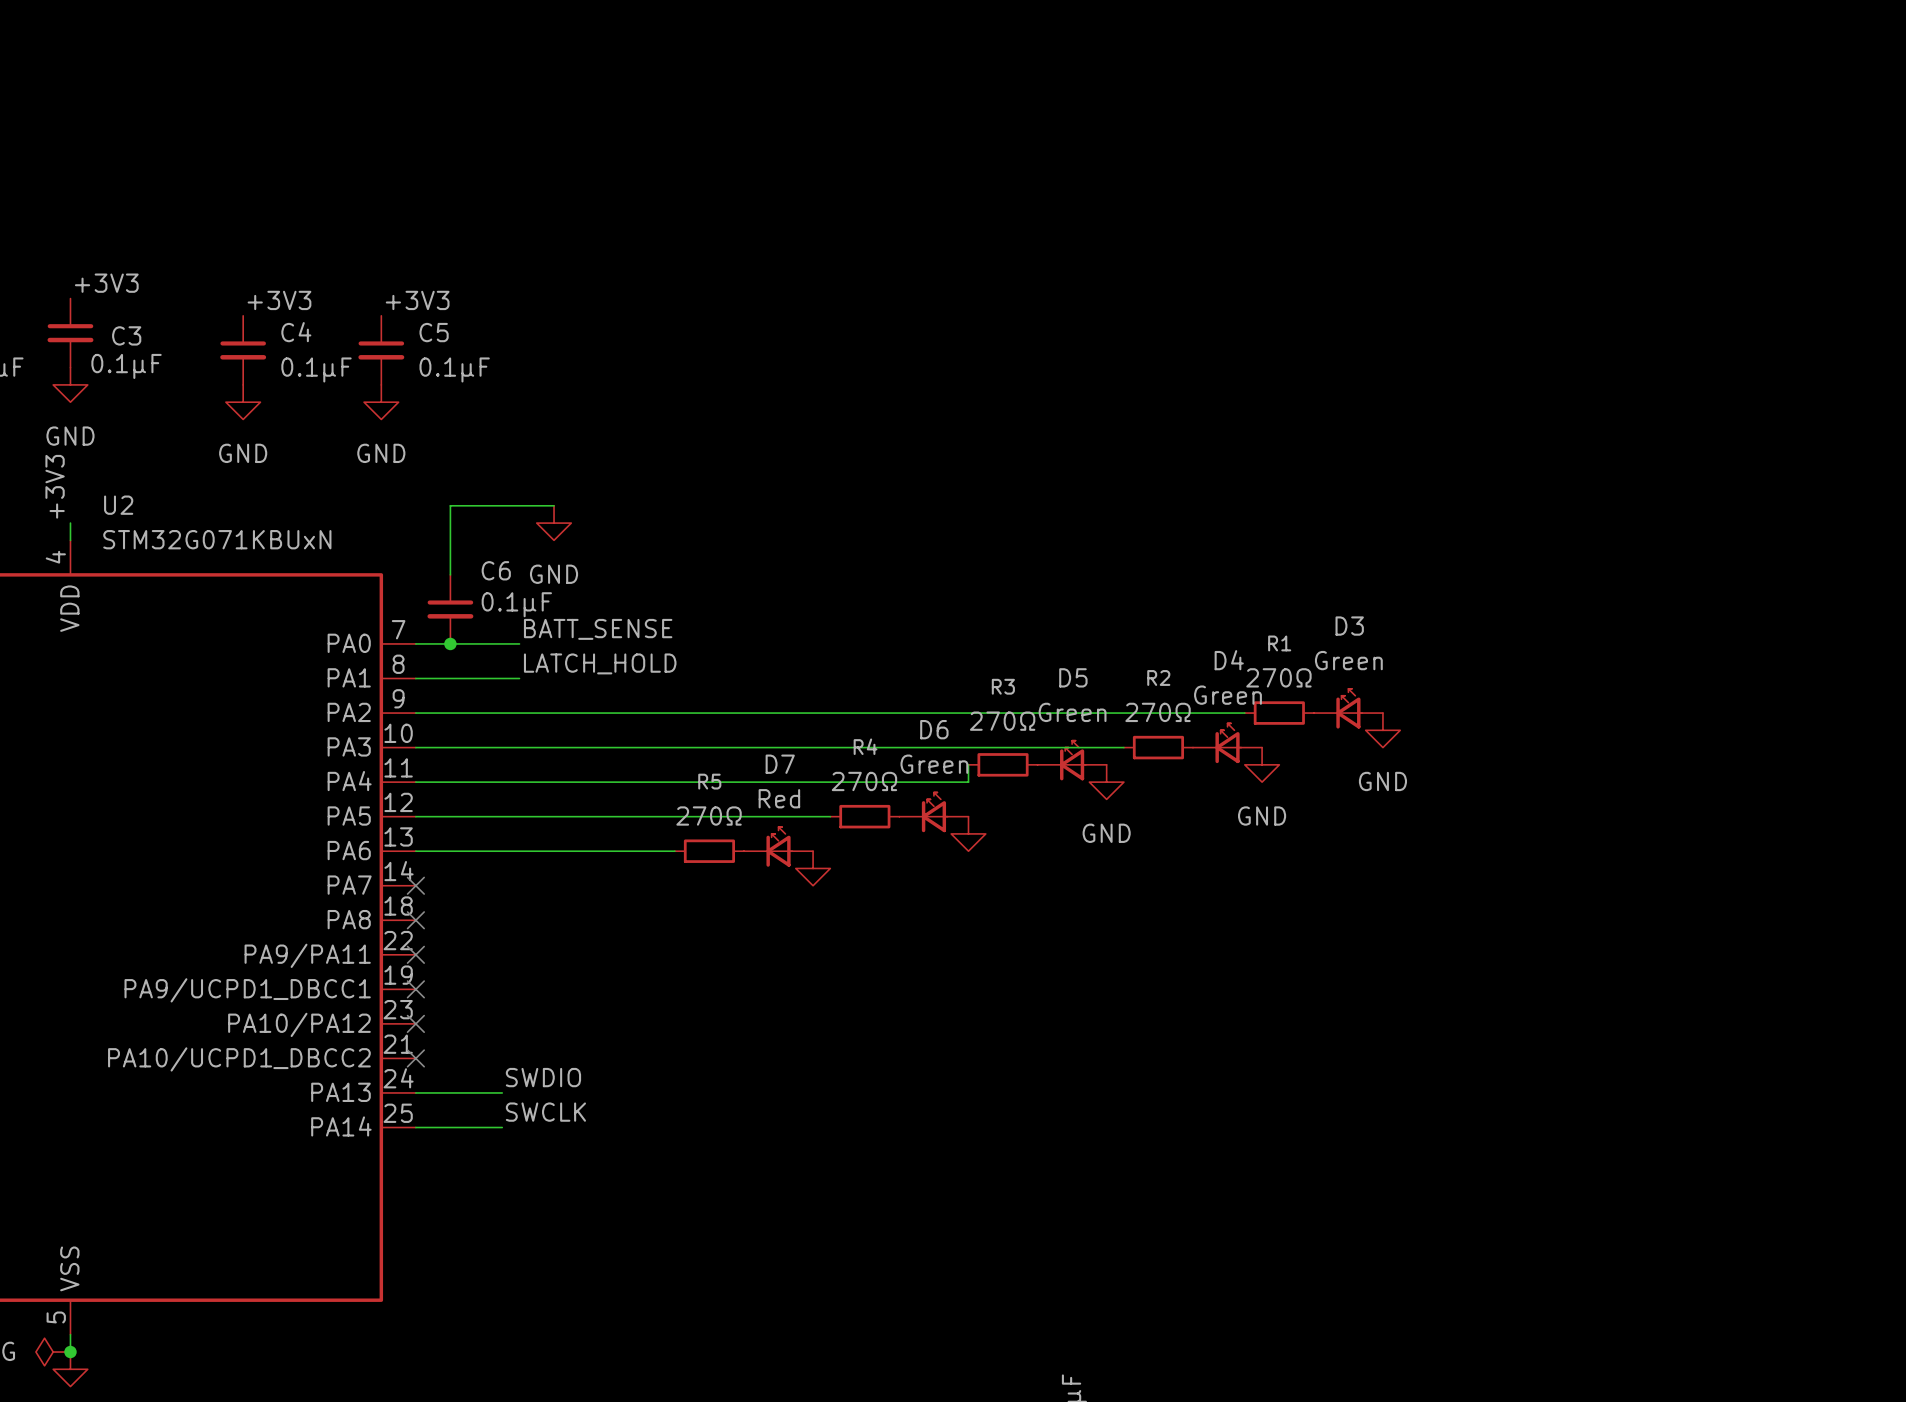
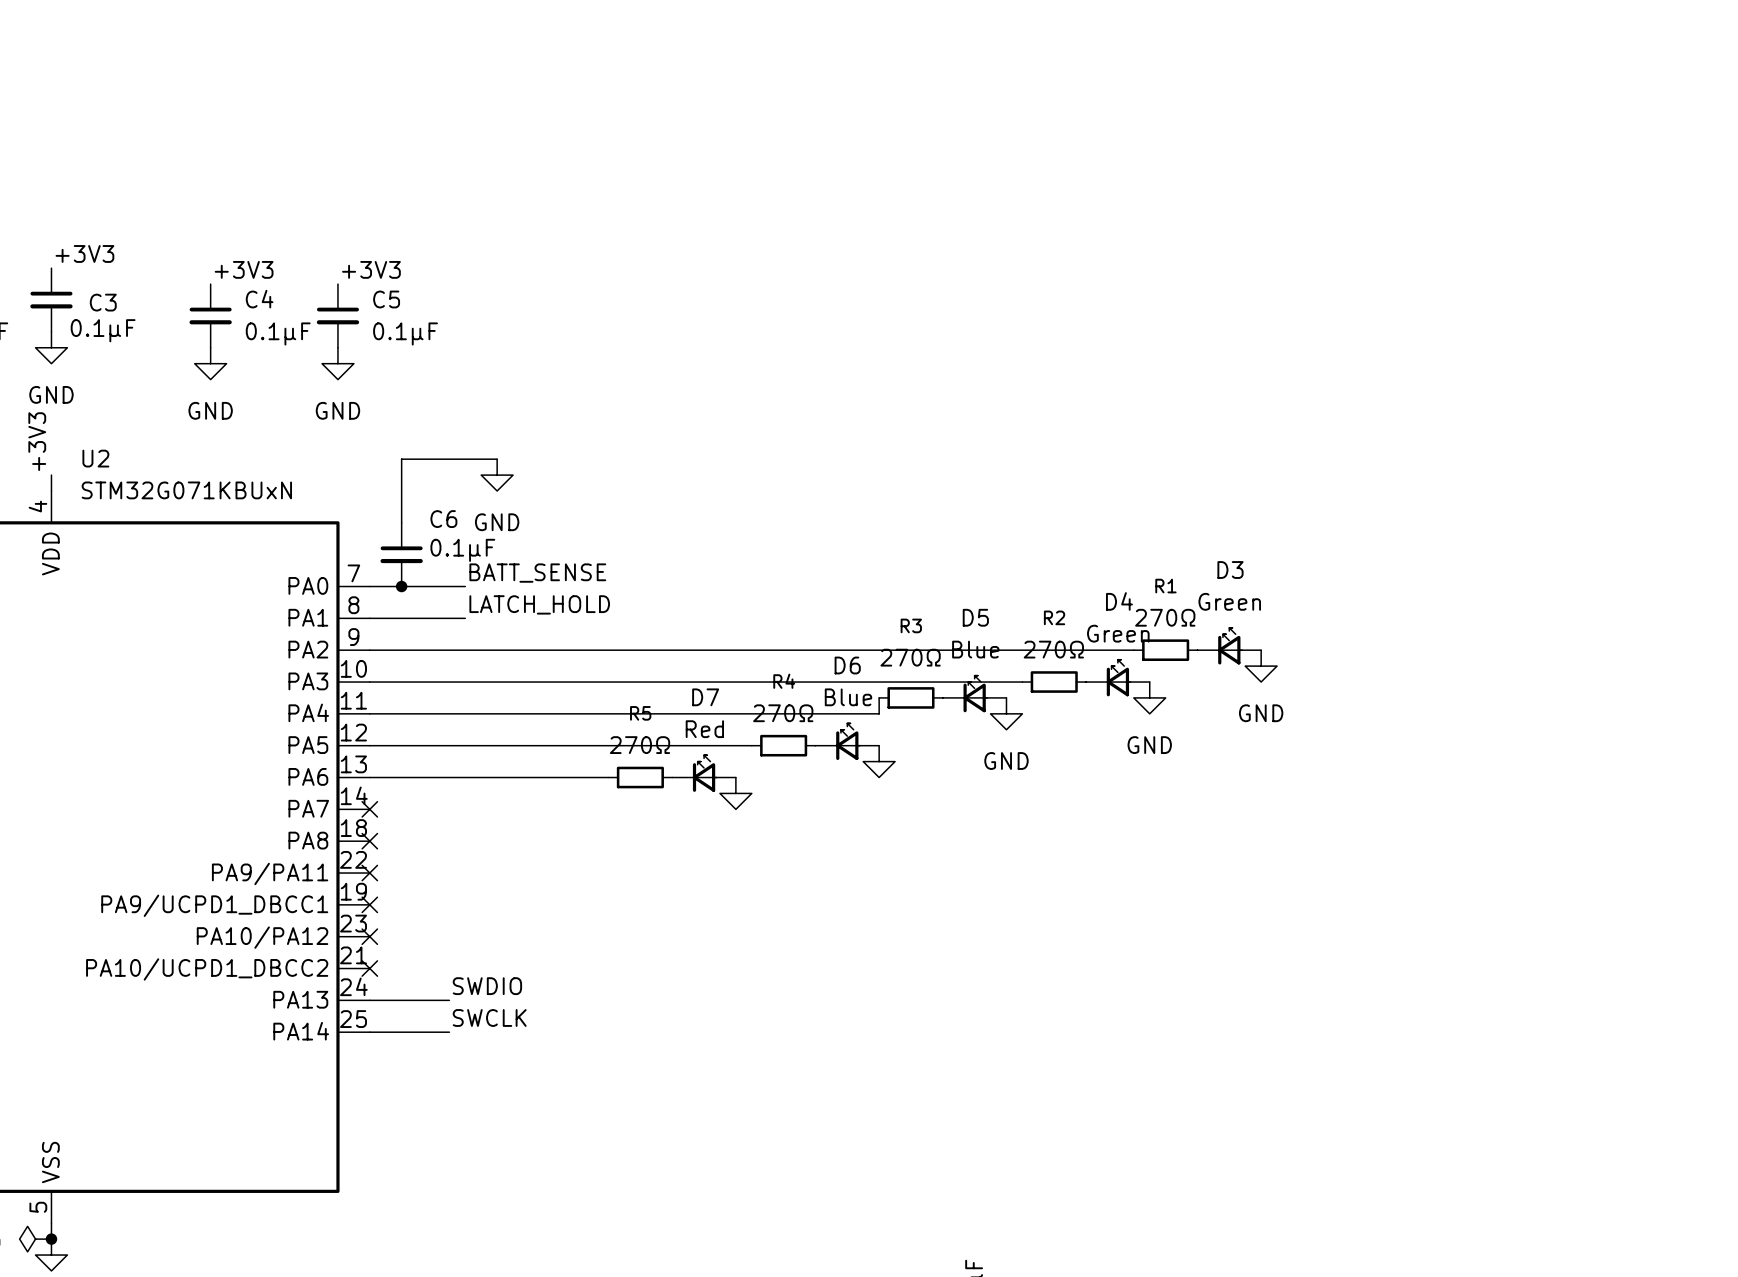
D5 value: Green (1072, 712) -> Blue (975, 649)
D6 value: Green (934, 764) -> Blue (848, 697)

